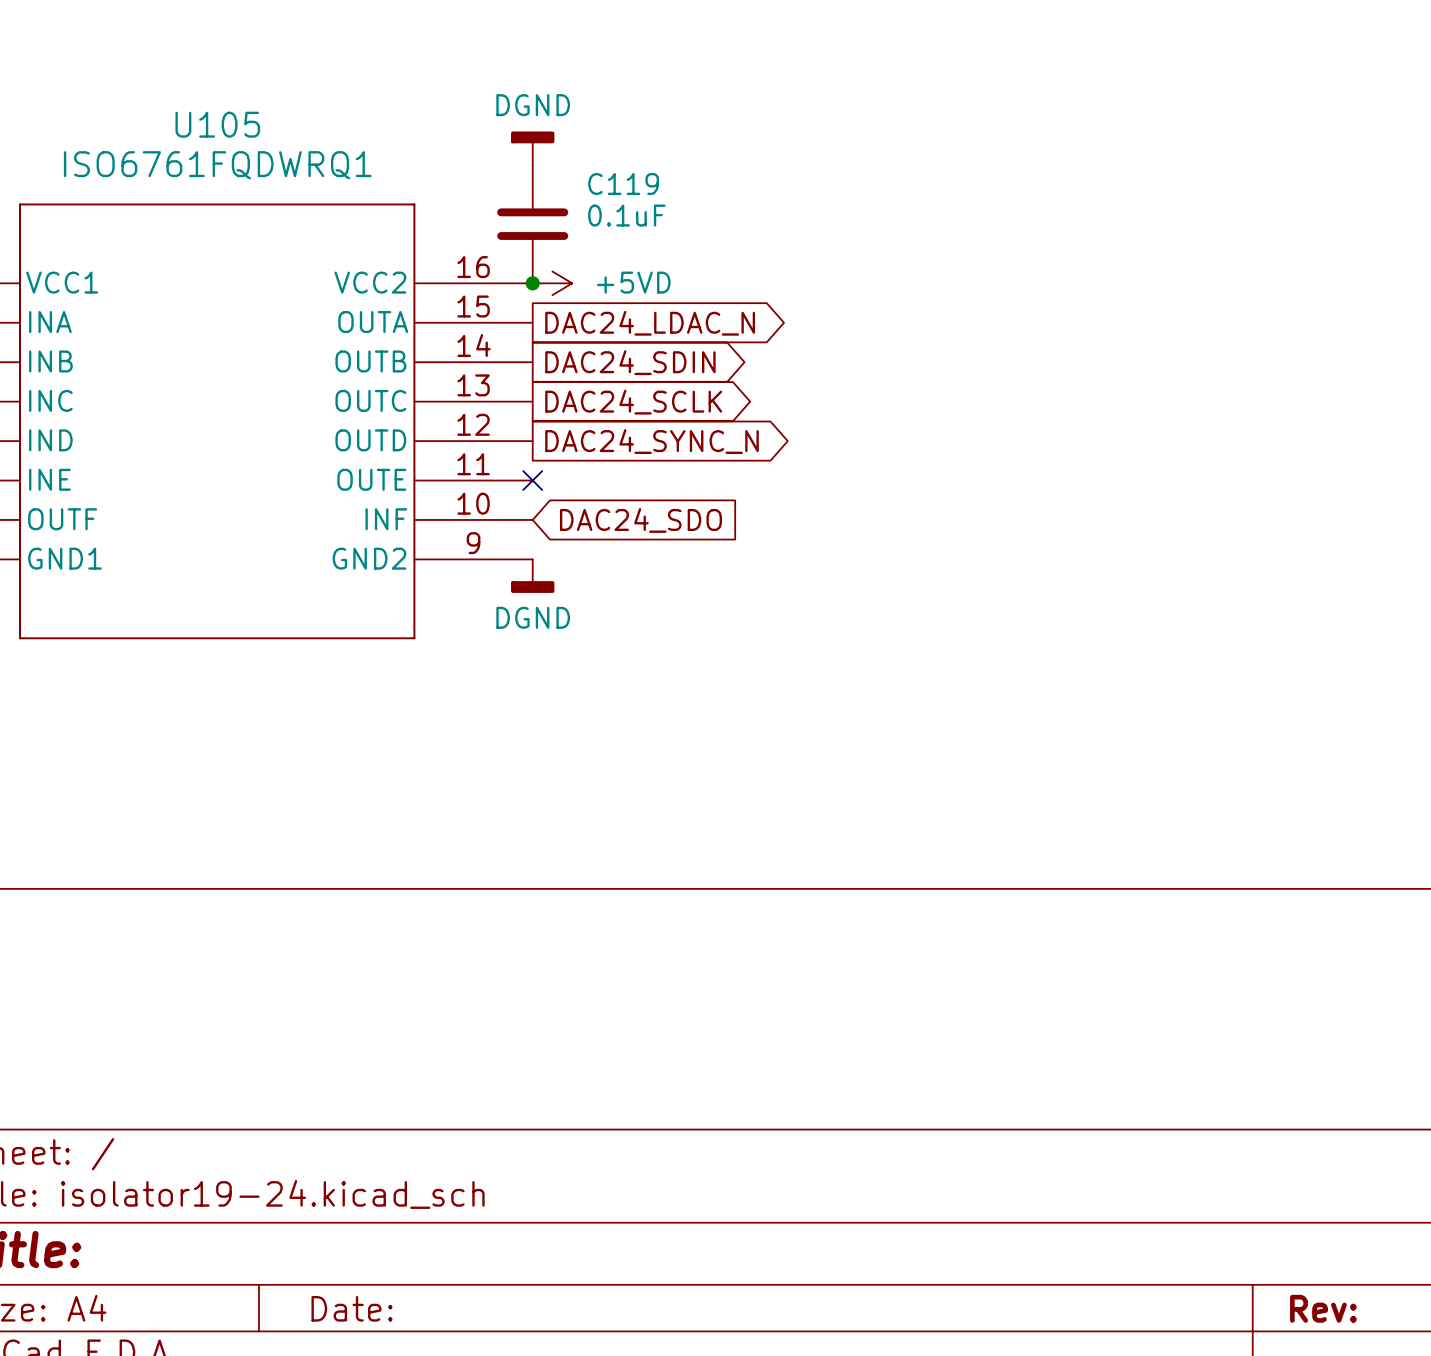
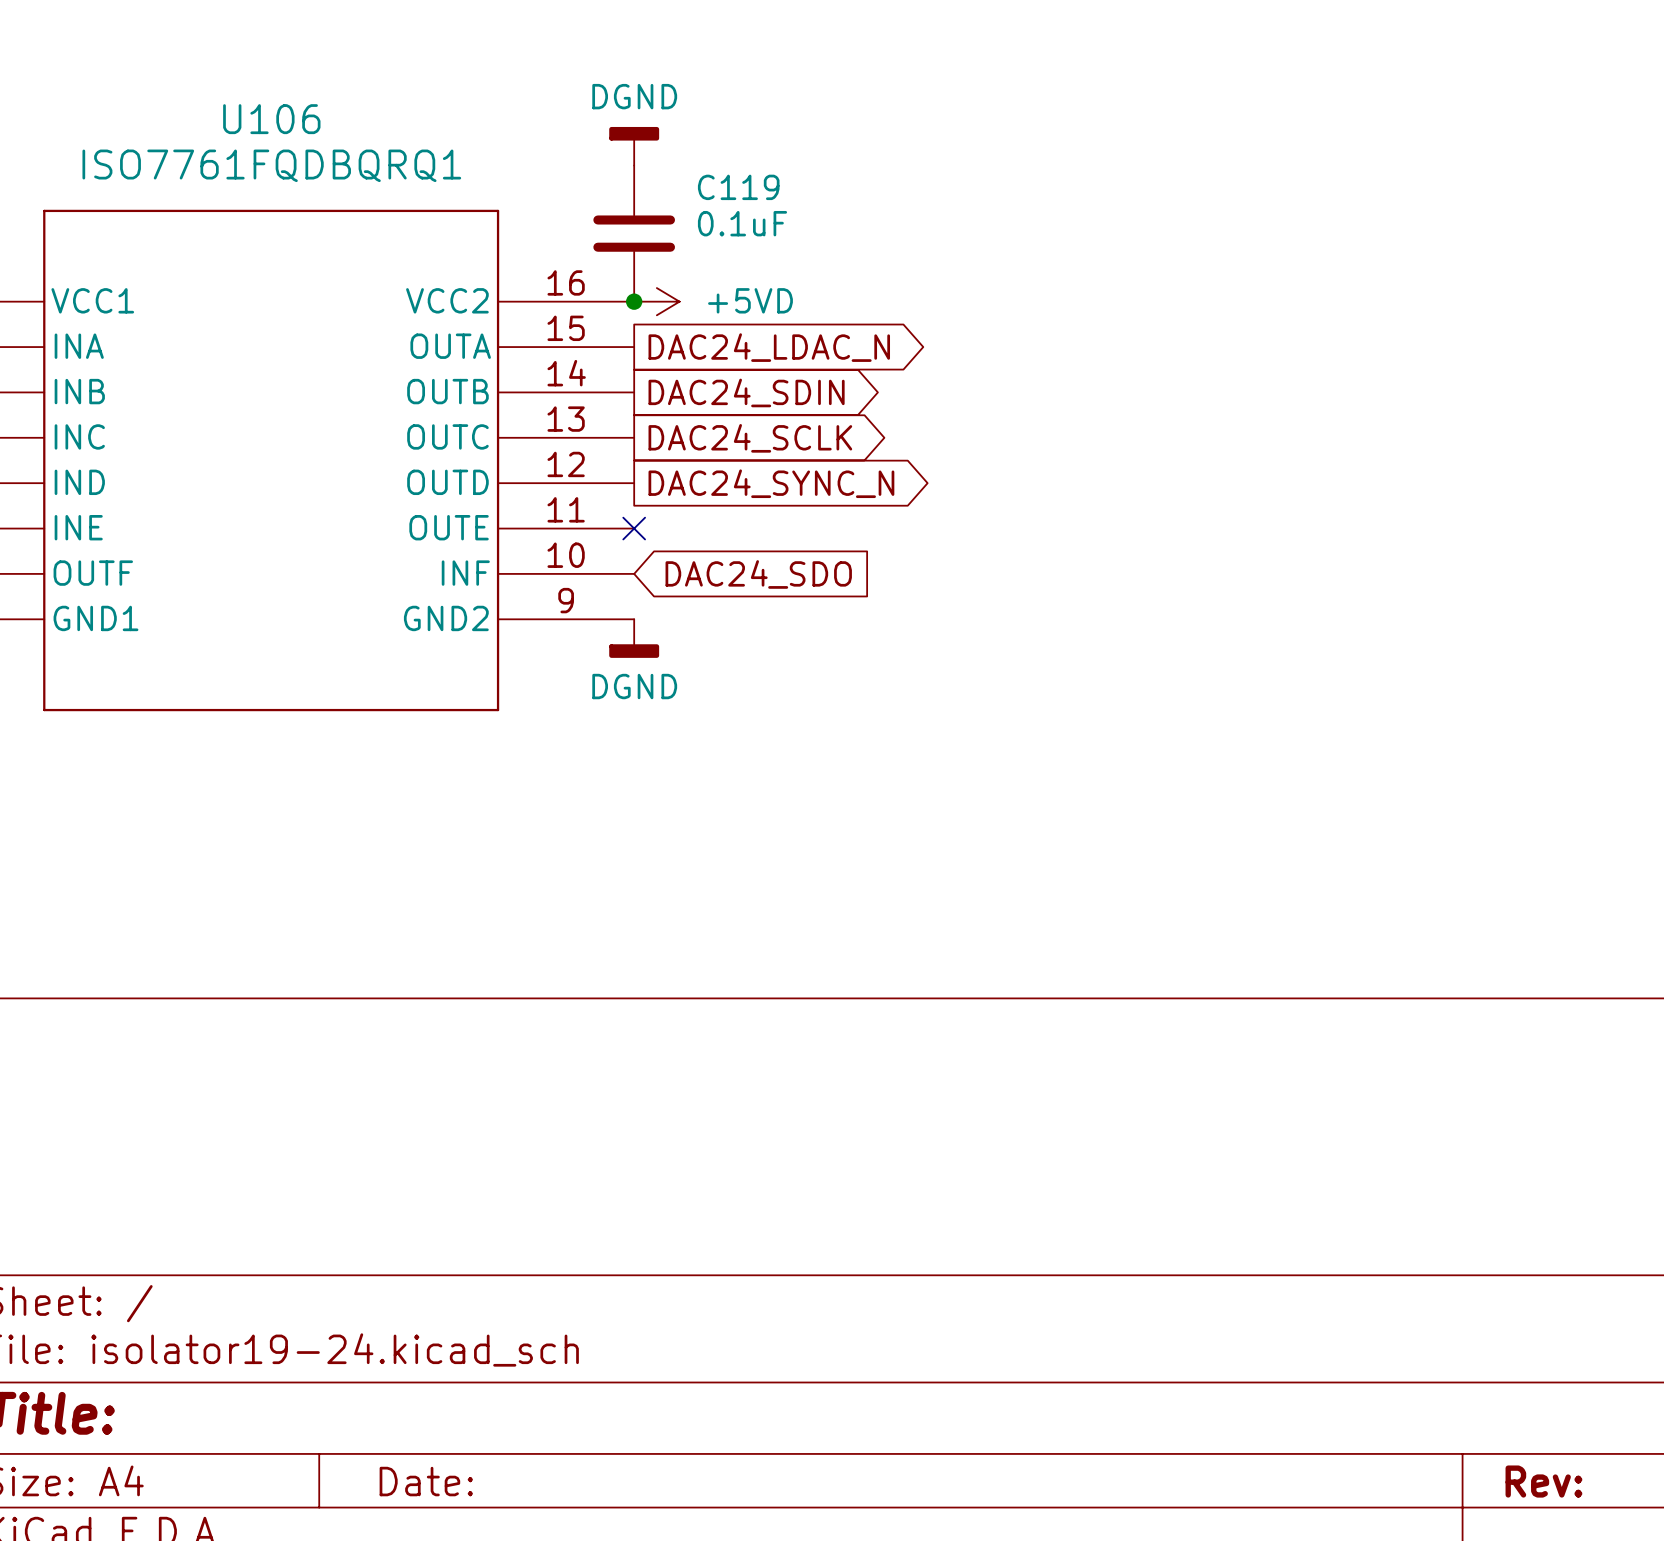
U105 name: U105 (217, 124) -> U106 (271, 119)
U105 value: ISO6761FQDWRQ1 (217, 165) -> ISO7761FQDBQRQ1 (271, 165)

